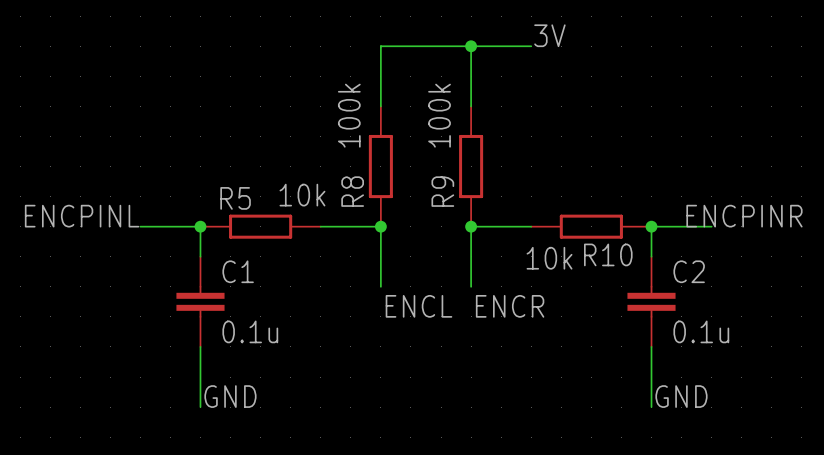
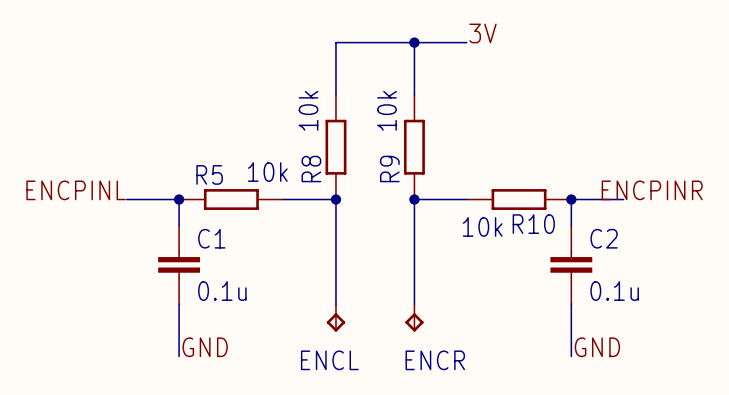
R8 value: 100k (349, 115) -> 10k (308, 110)
R9 value: 100k (439, 115) -> 10k (386, 110)
wire: none -> (335, 251) (335, 304)
wire: none -> (414, 251) (414, 304)
label: ENCL (418, 306) -> none
label: ENCR (510, 306) -> none
ENCL: none -> (335, 317)
ENCR: none -> (414, 317)

